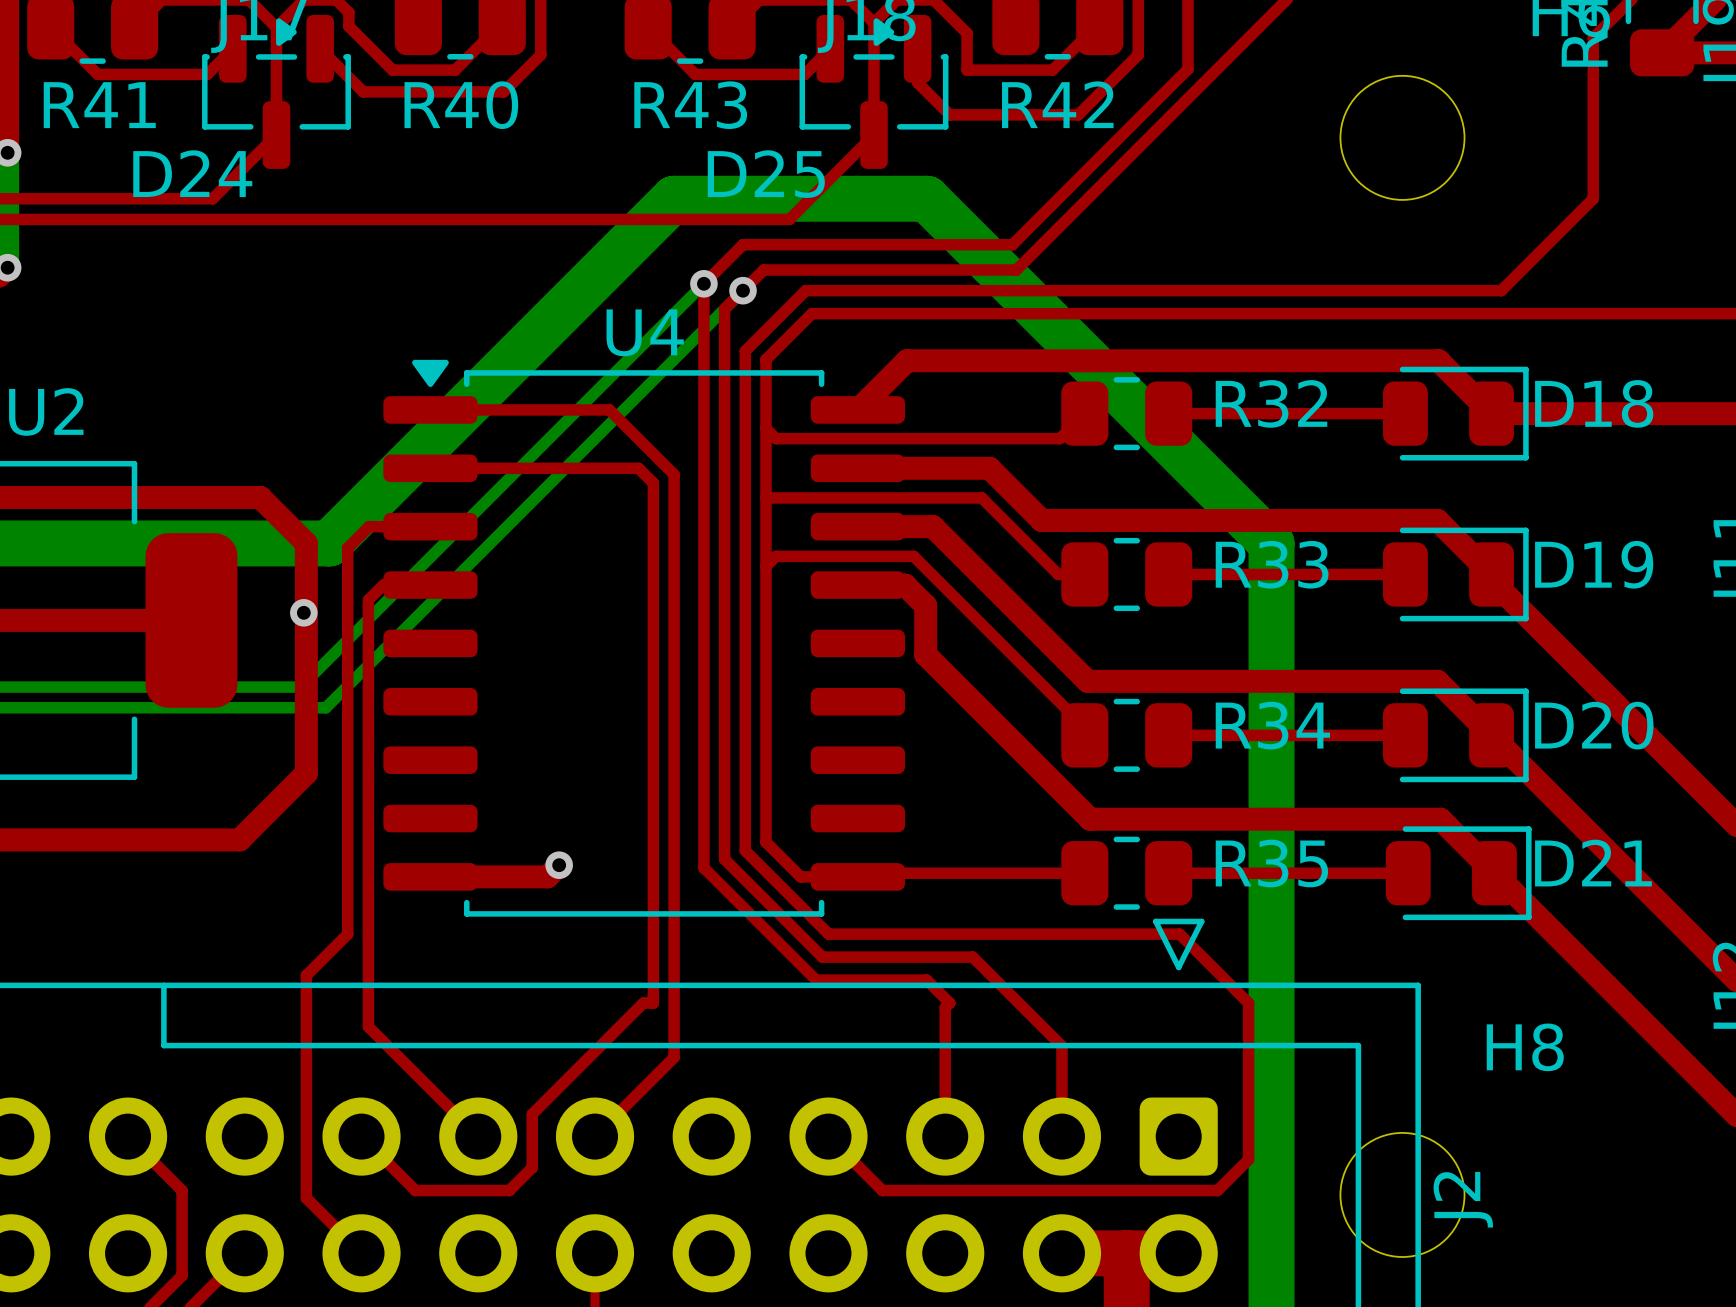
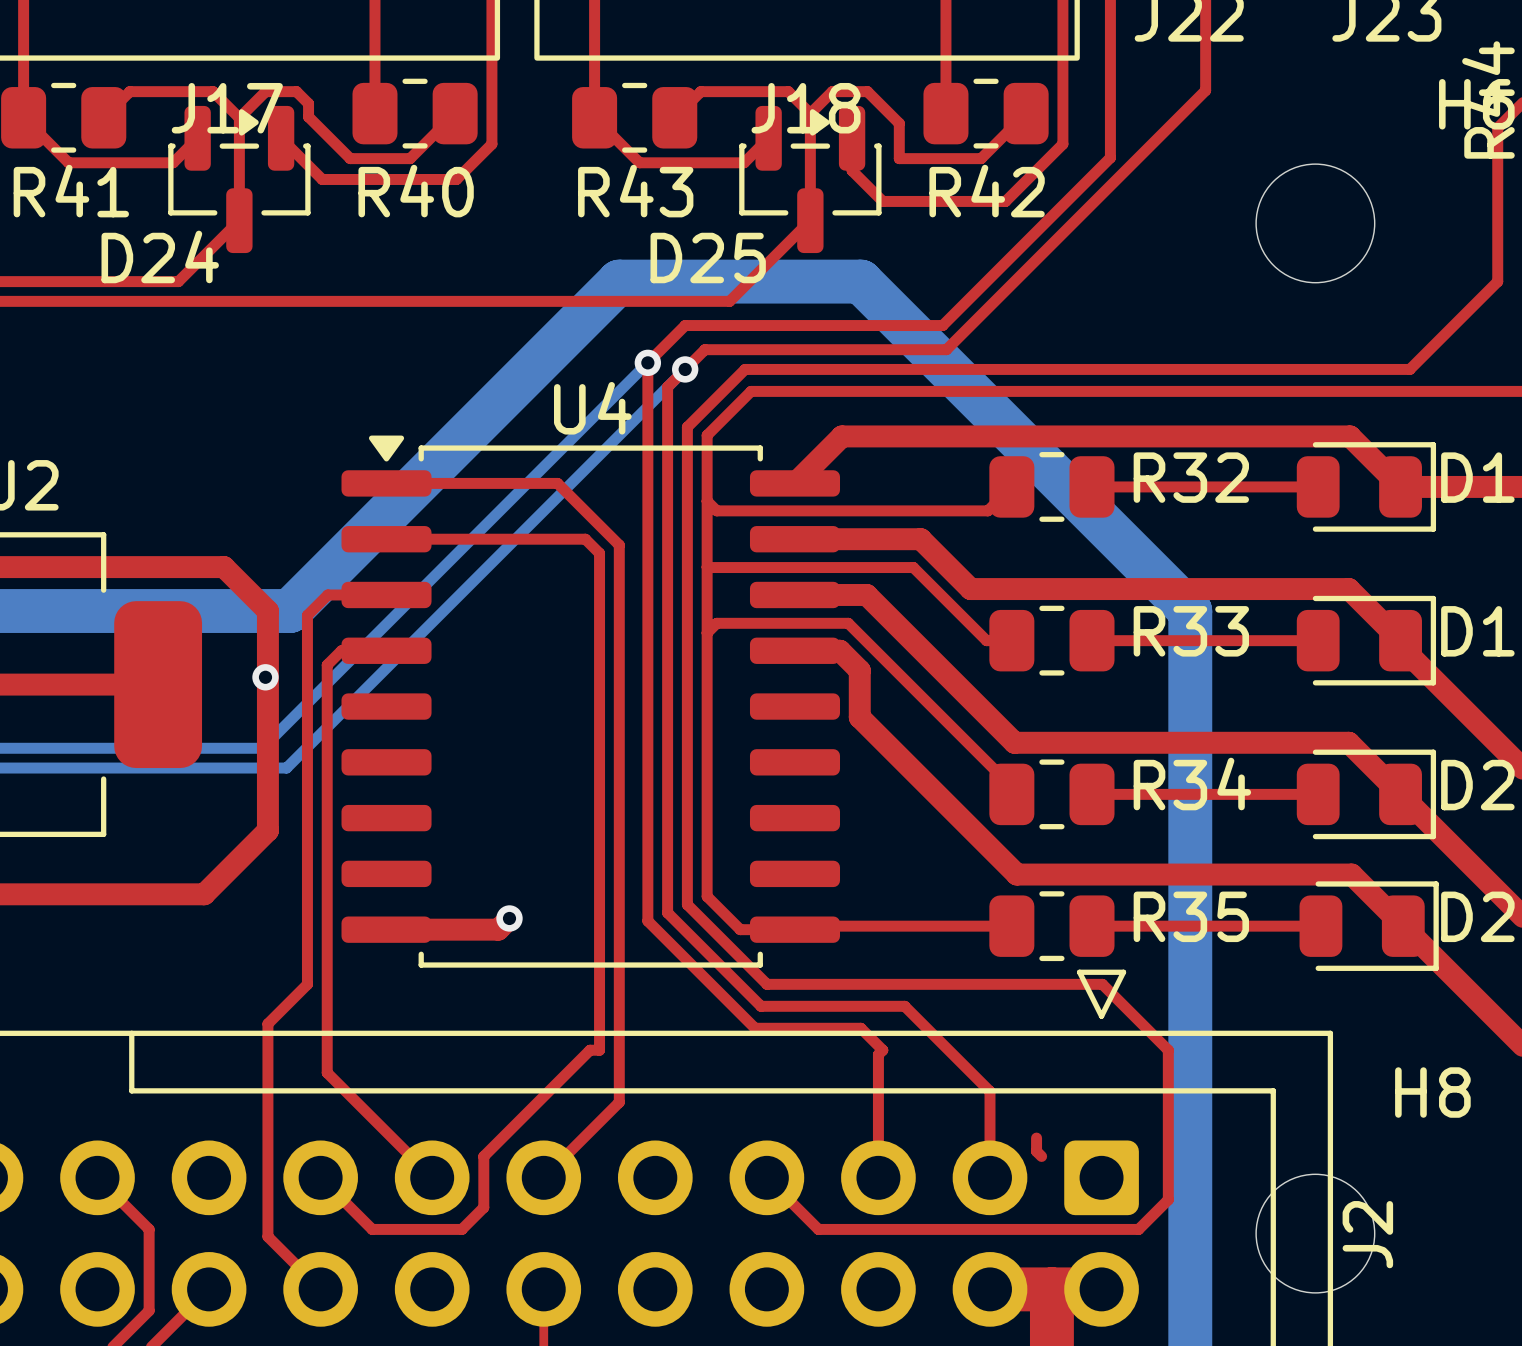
top track: none -> (1036, 1138) (1036, 1151) (1041, 1156)

